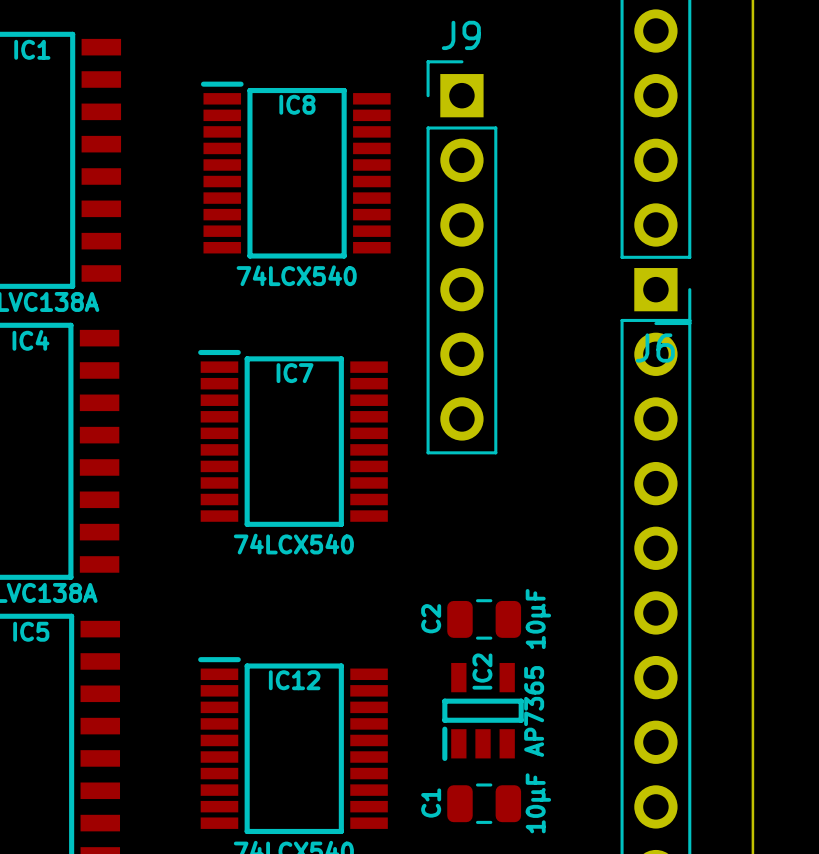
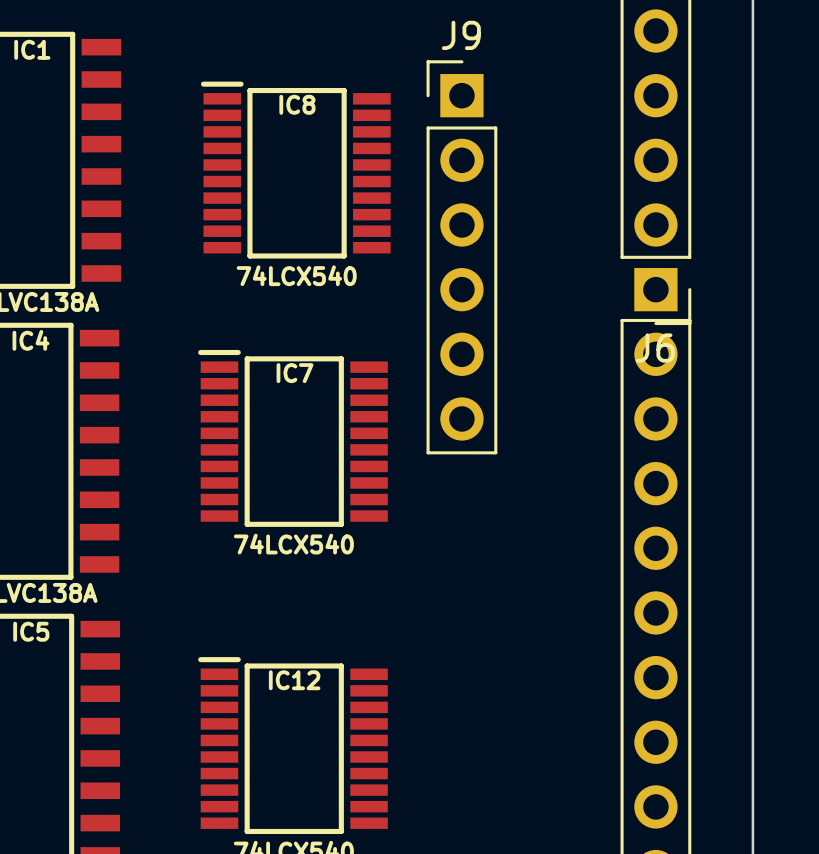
C2: 10µF (484, 619) -> none
IC2: (483, 711) -> none
C1: 10µF (484, 803) -> none

